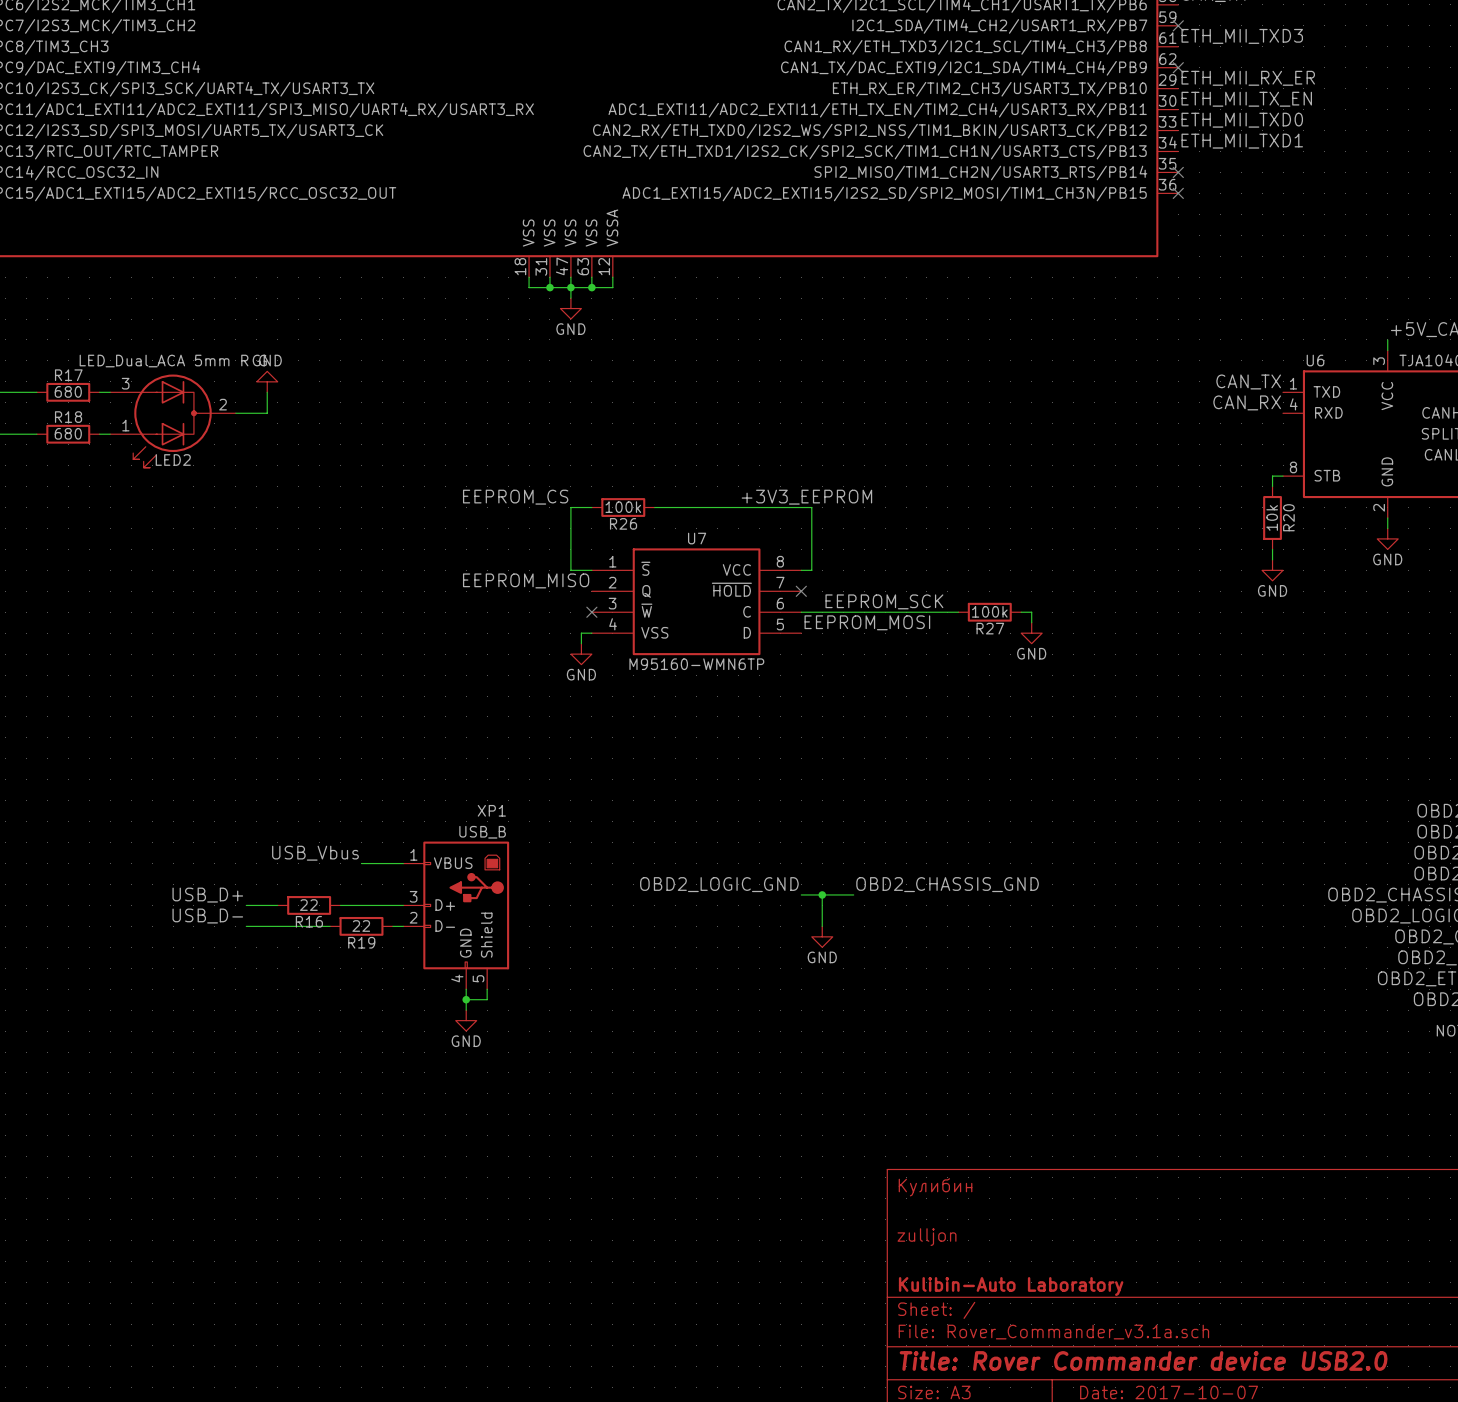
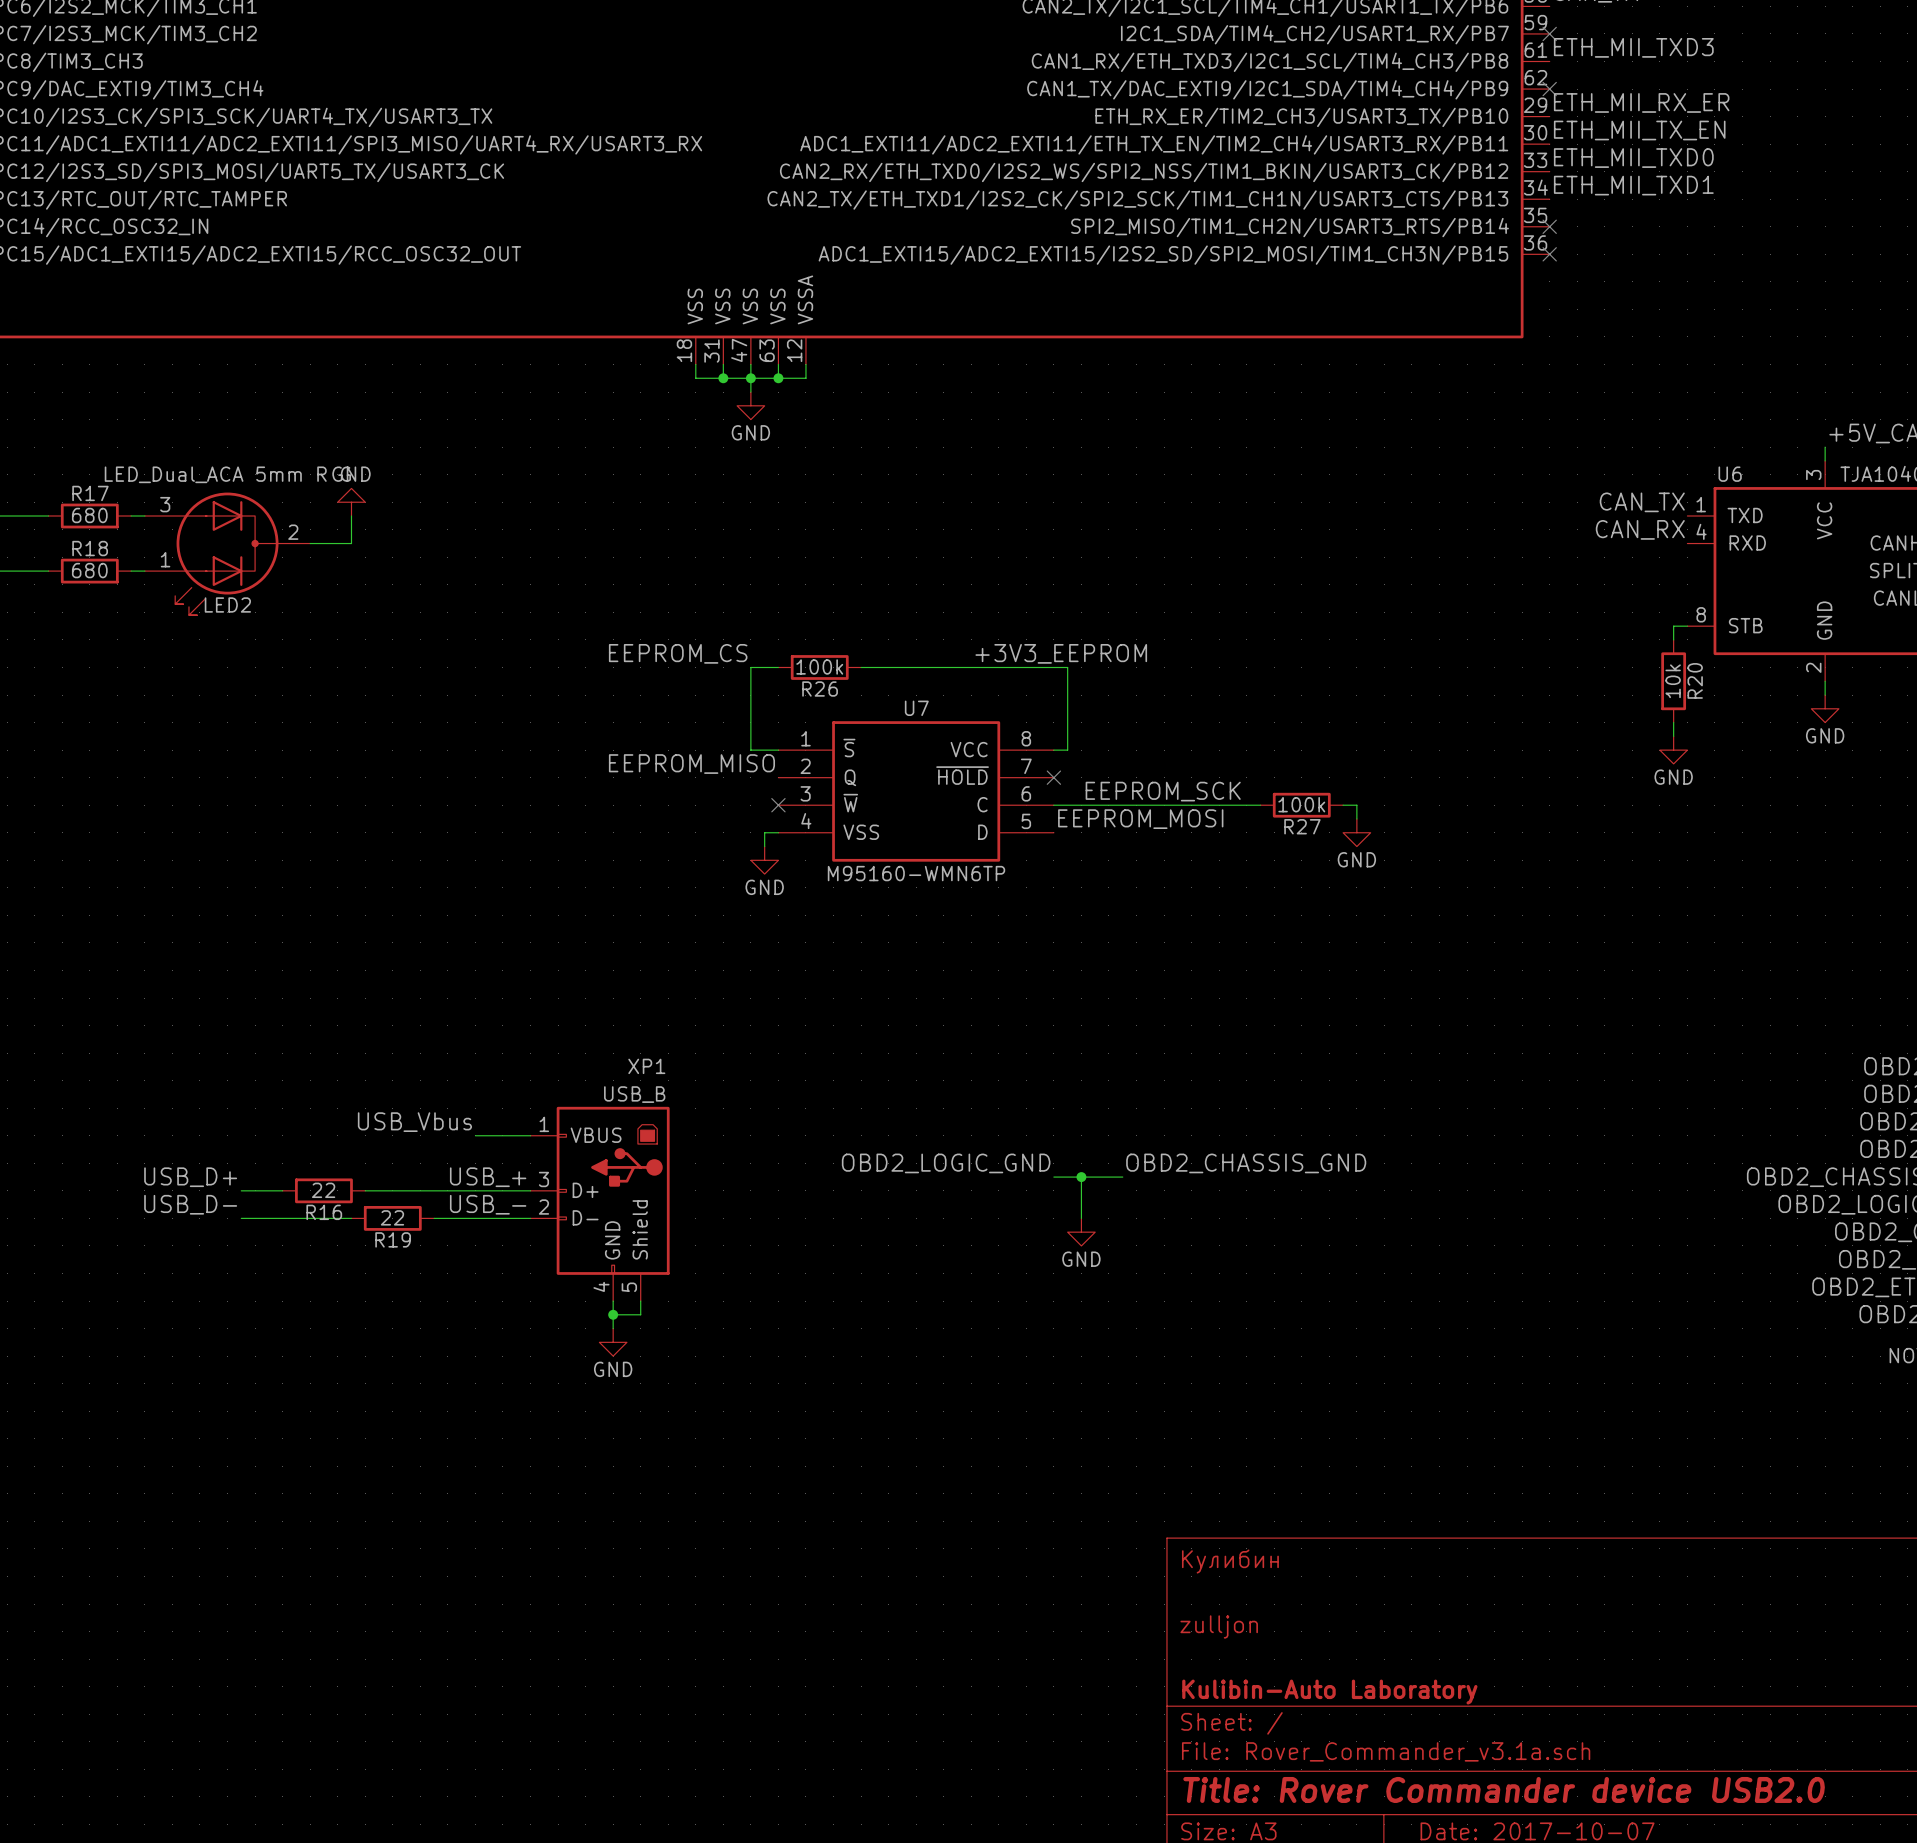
label position: USB_D+ (207, 895) -> USB_D+ (190, 1177)
label: none -> USB_+ (488, 1177)
wire: none -> (241, 1190) (282, 1190)
wire: (246, 905) (277, 905) -> (447, 1190) (365, 1190)
R16 position: (309, 905) -> (323, 1190)
label position: USB_D- (207, 916) -> USB_D- (190, 1204)
label: none -> USB_- (488, 1204)
wire: none -> (241, 1218) (323, 1218)
wire: (267, 926) (330, 926) -> (516, 1218) (434, 1218)
R19 position: (361, 926) -> (392, 1218)

